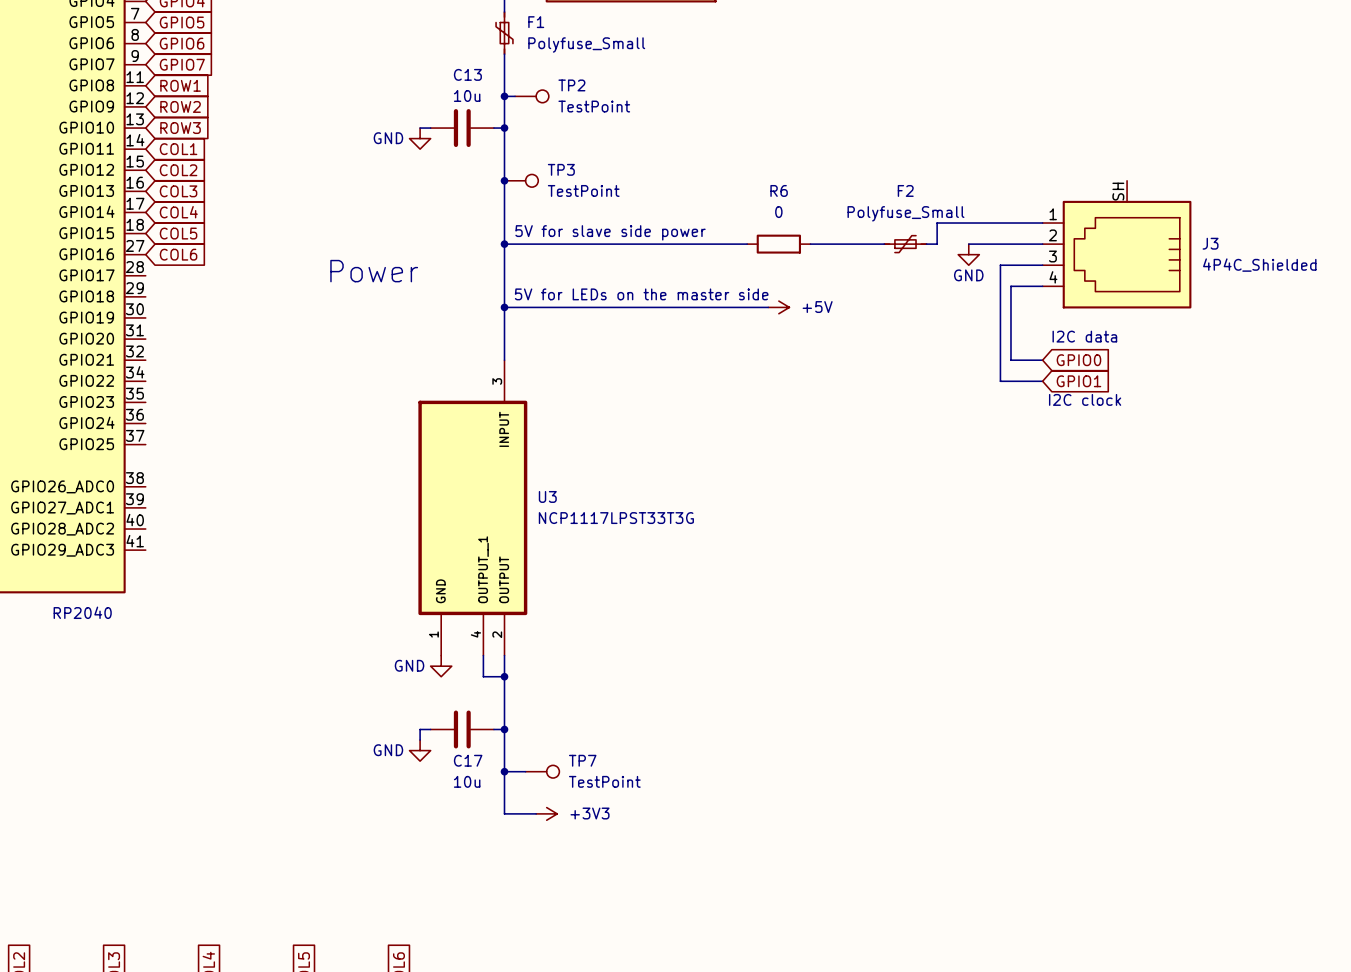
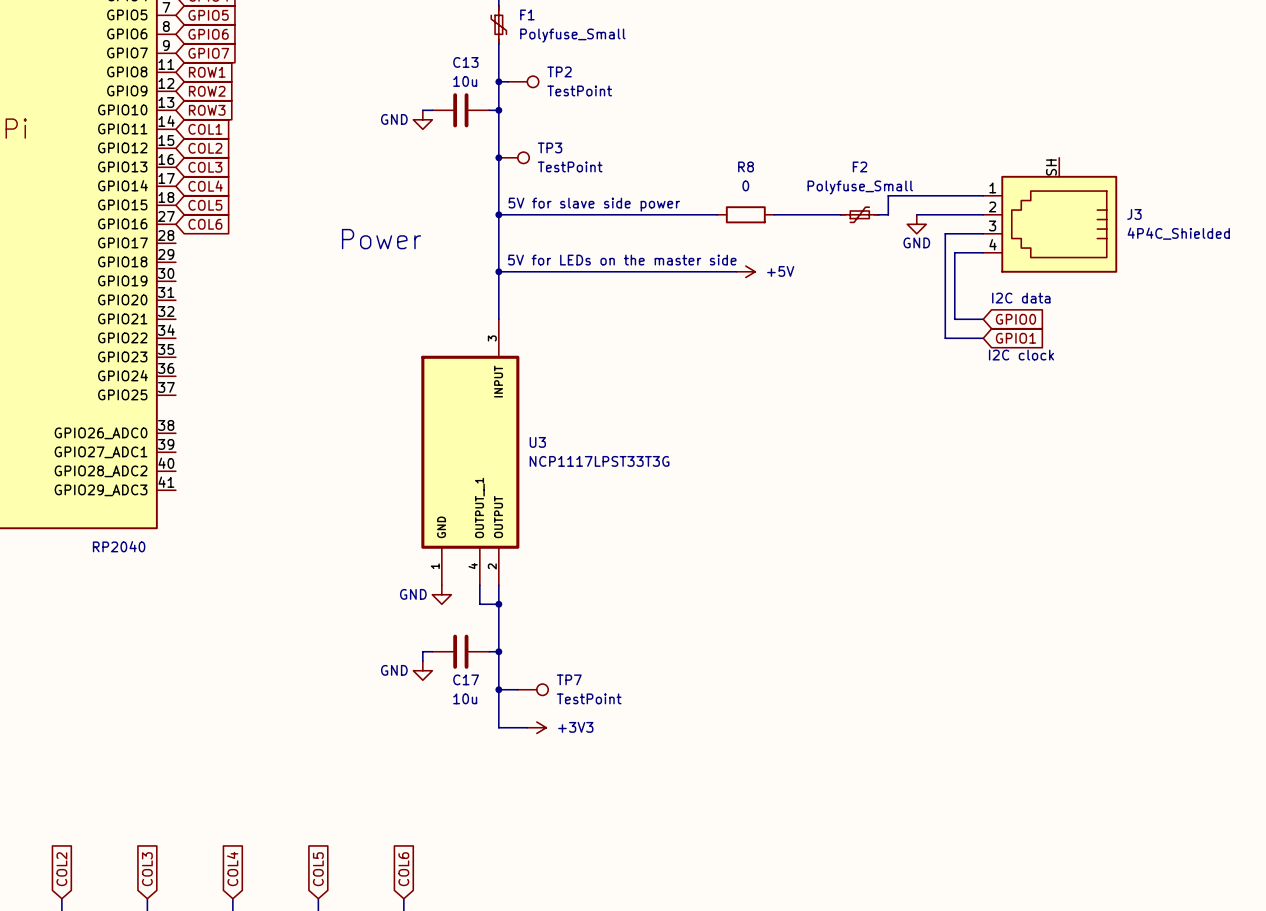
R6 name: R6 (779, 190) -> R8 (746, 166)

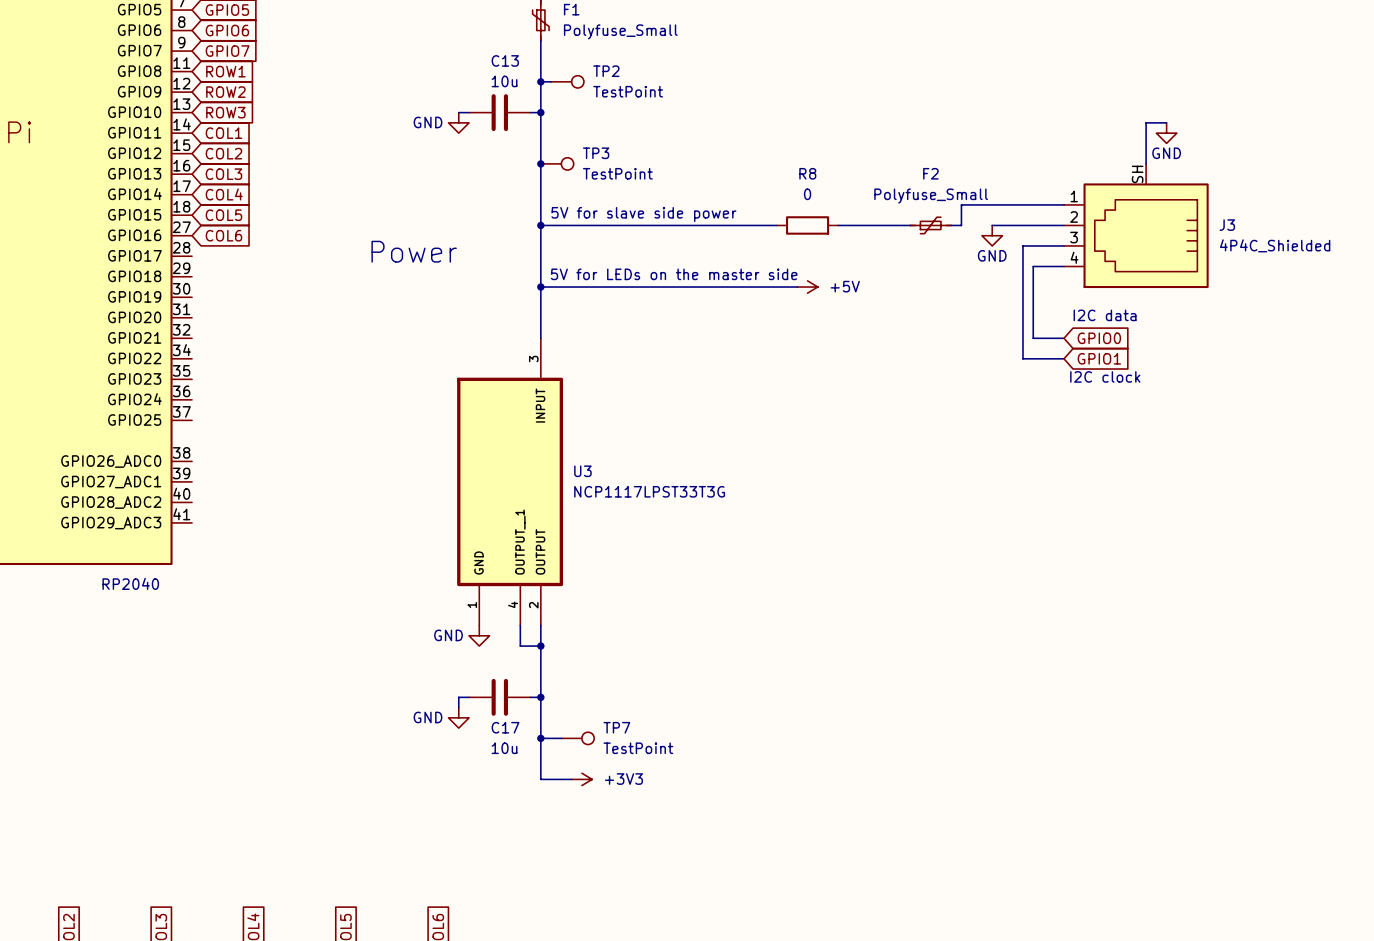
wire: none -> (1166, 122) (1146, 122) (1146, 163)
power symbol: none -> GND (1166, 133)

